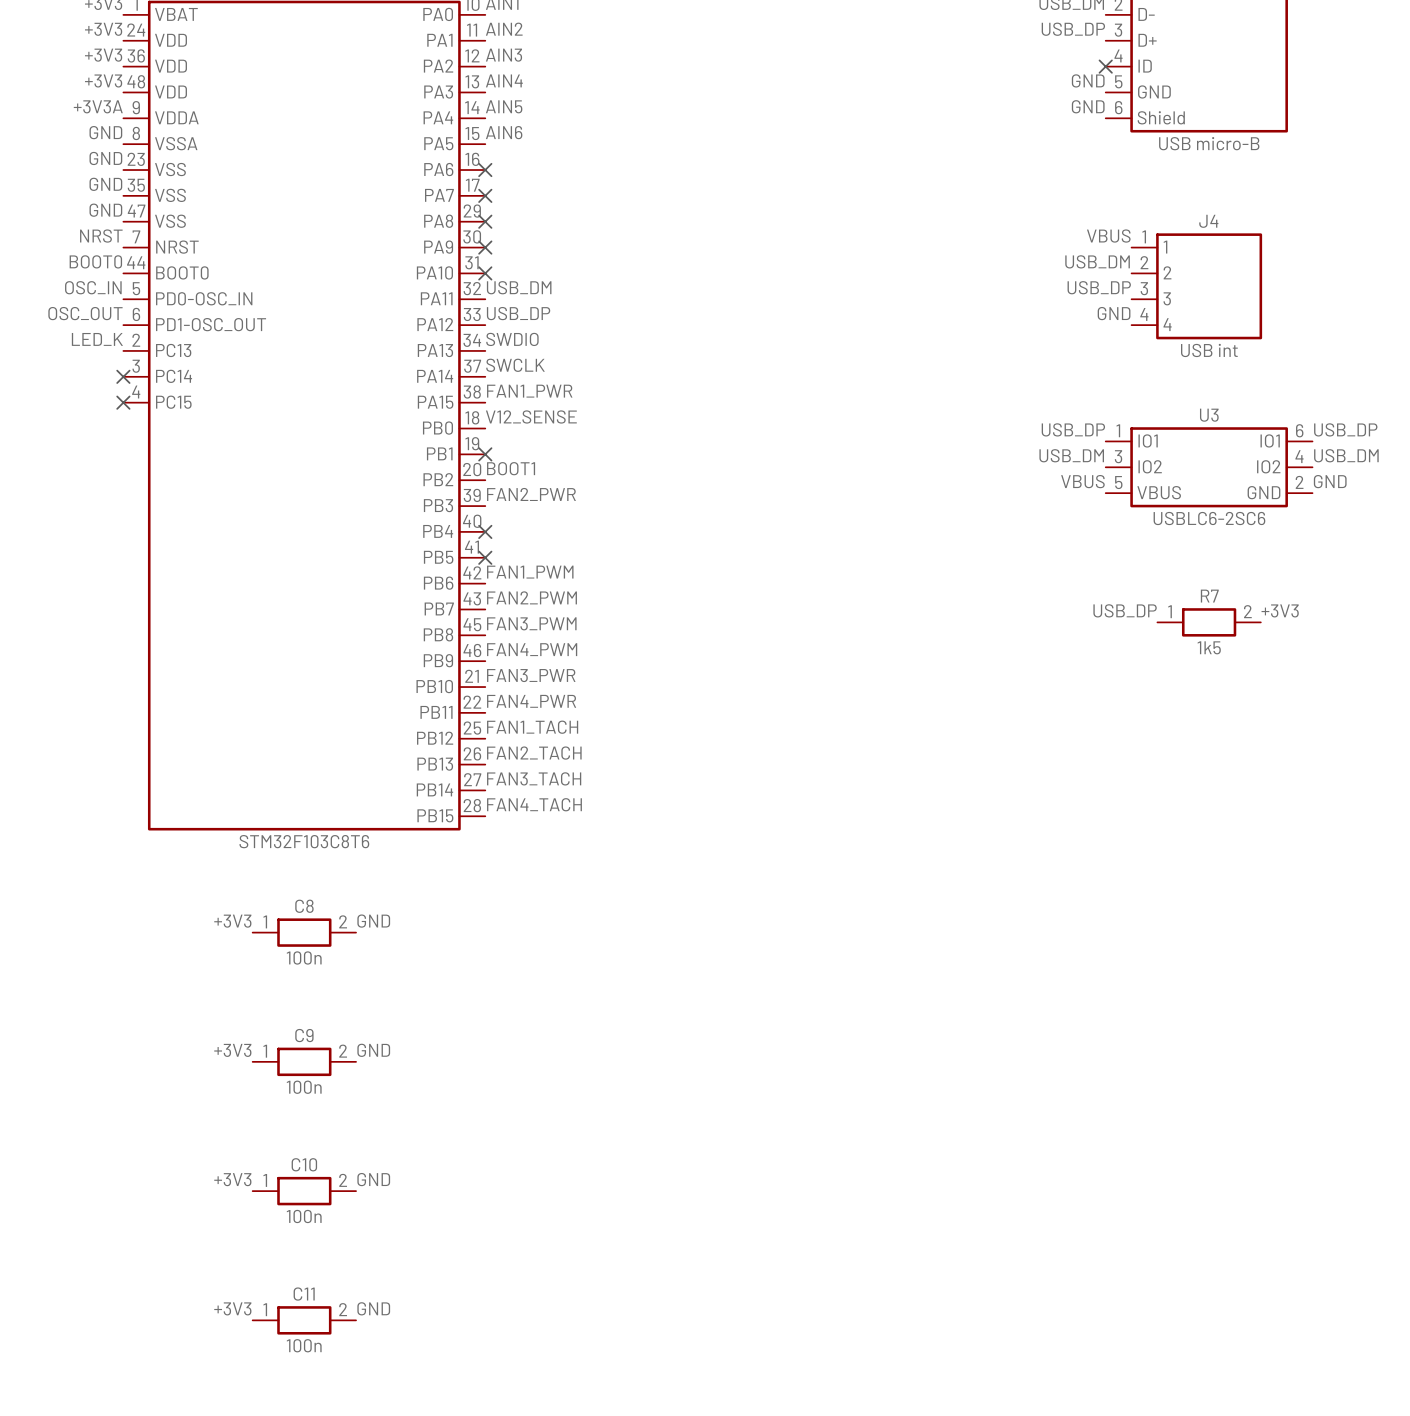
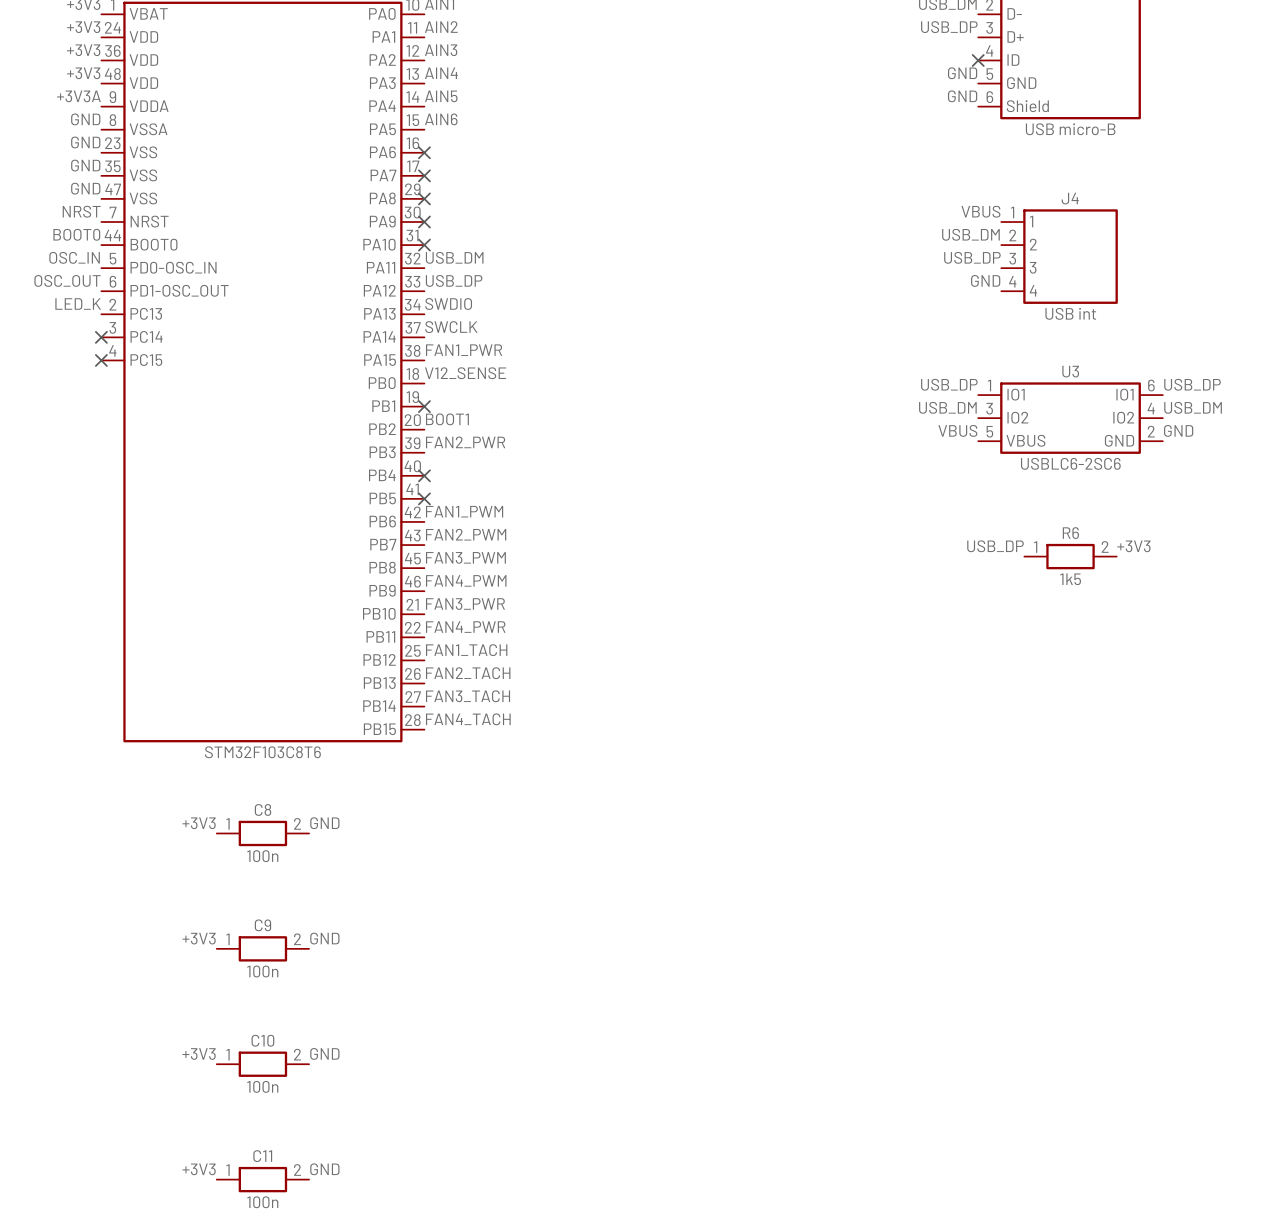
R7 name: R7 (1209, 596) -> R6 (1070, 533)

